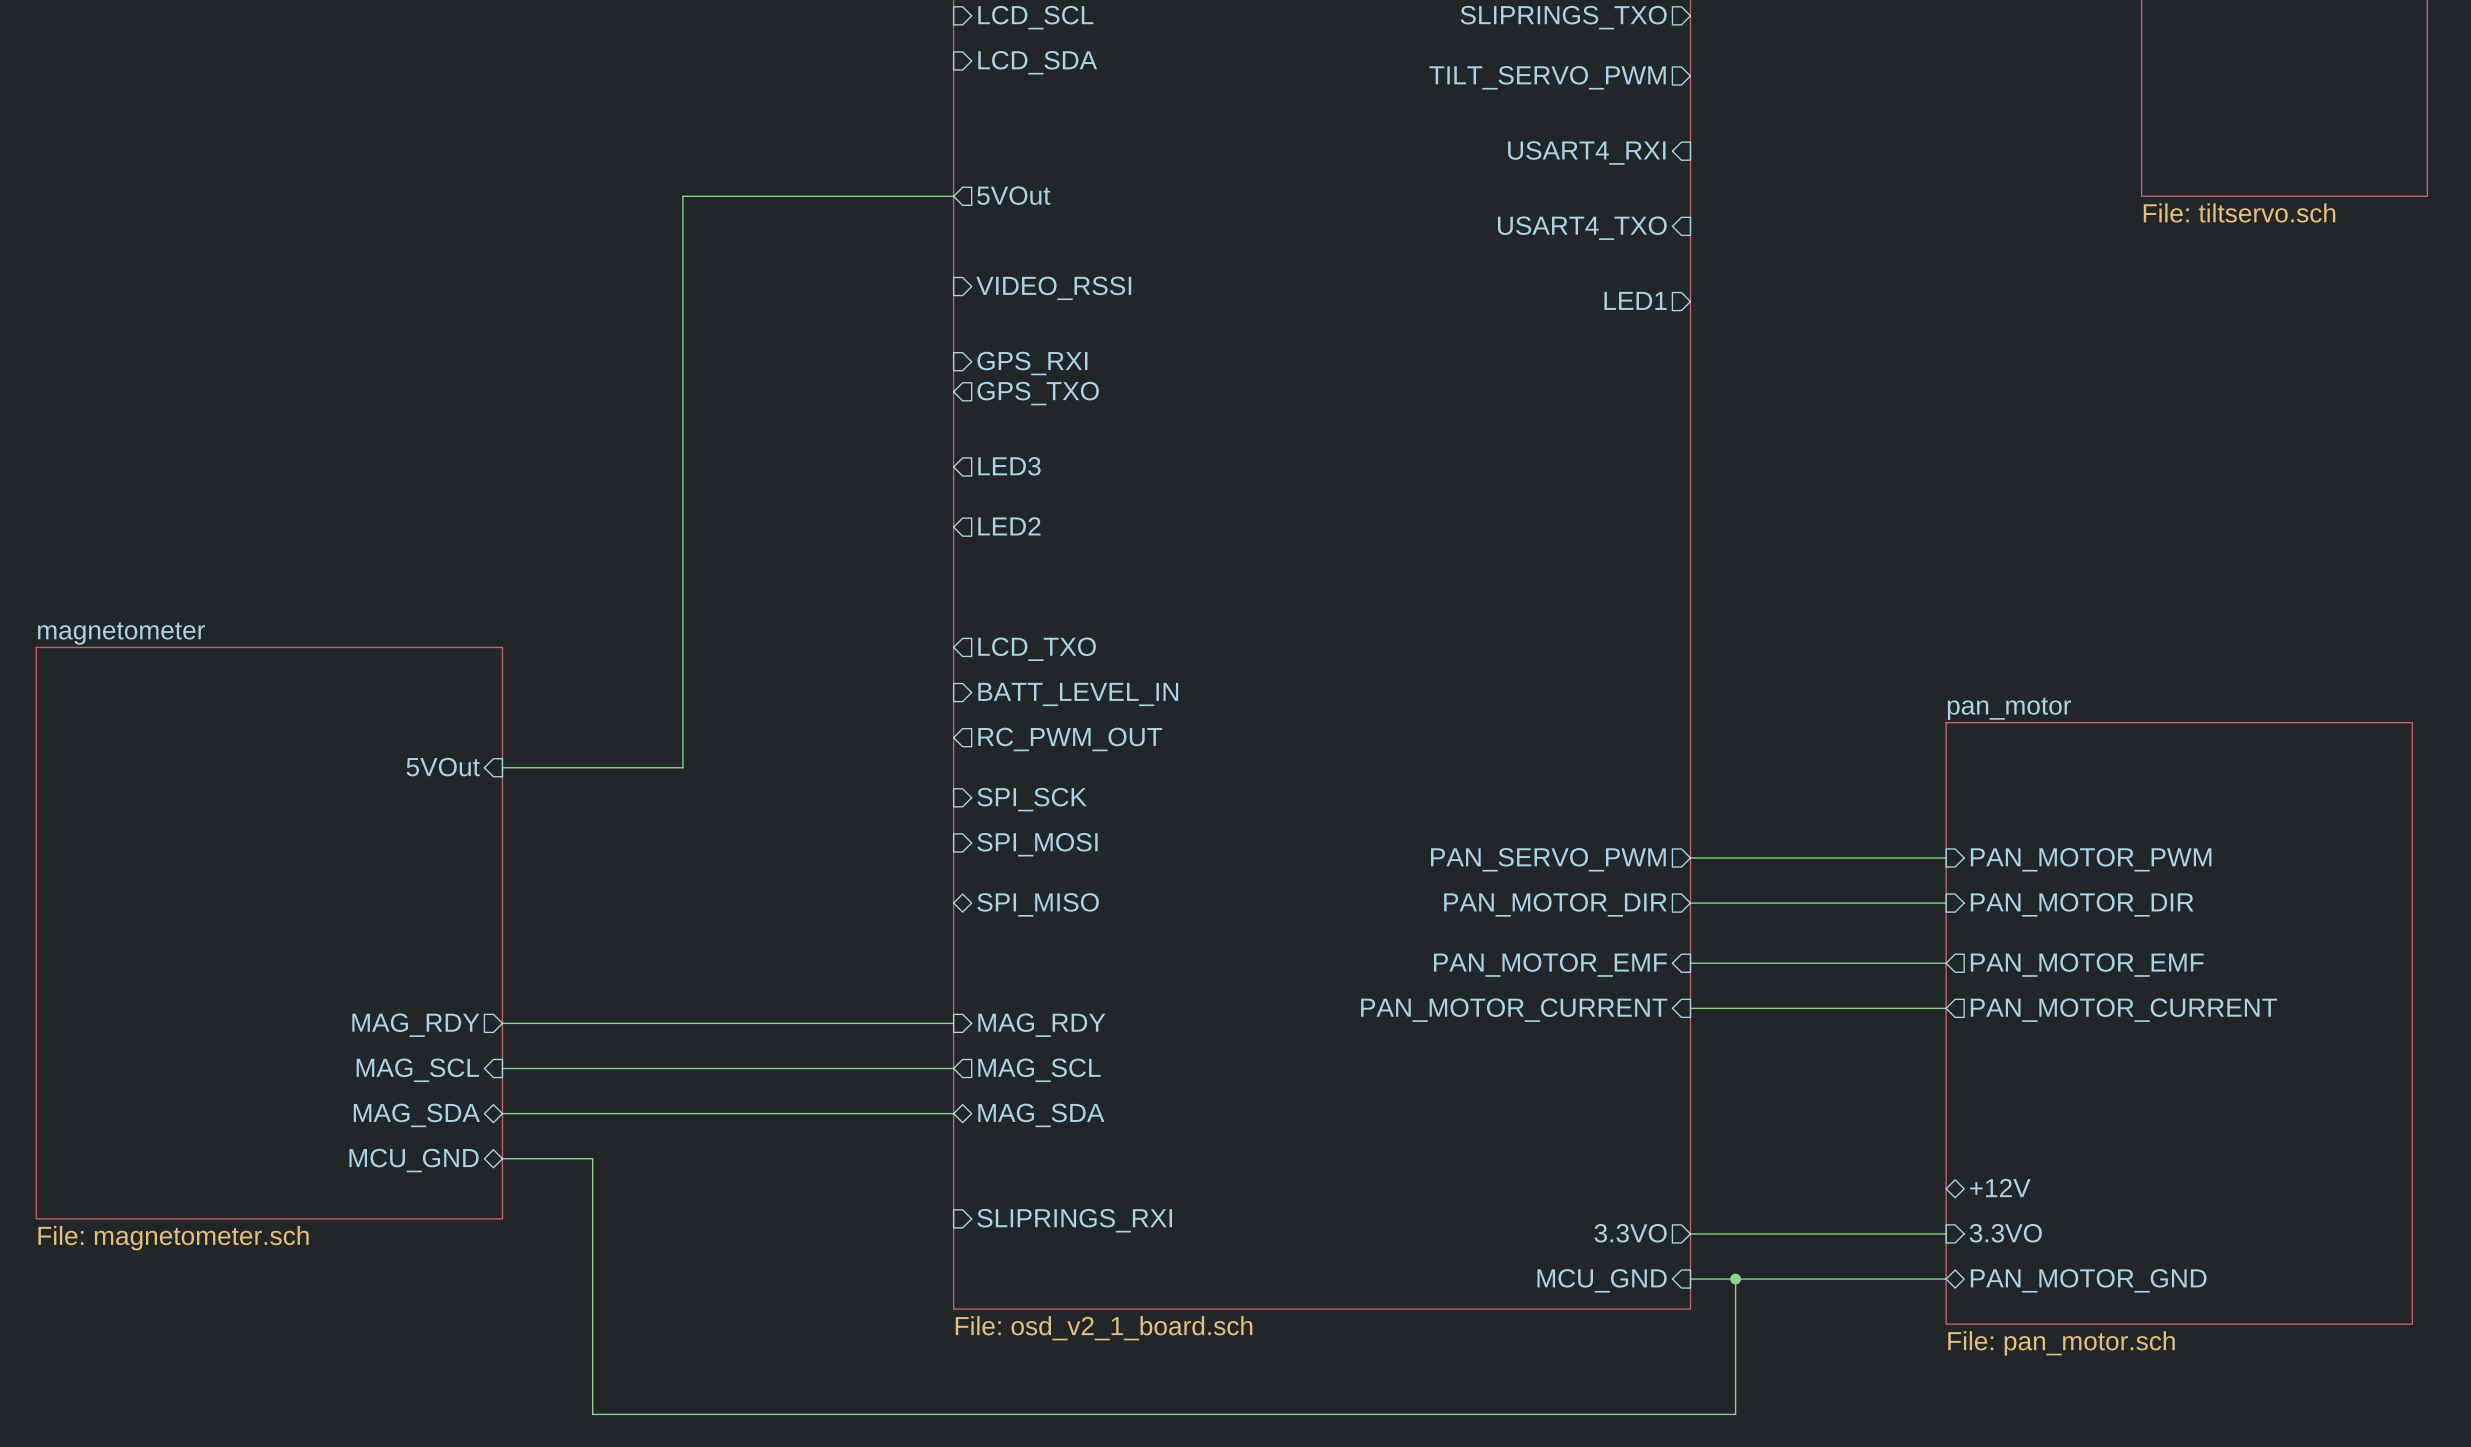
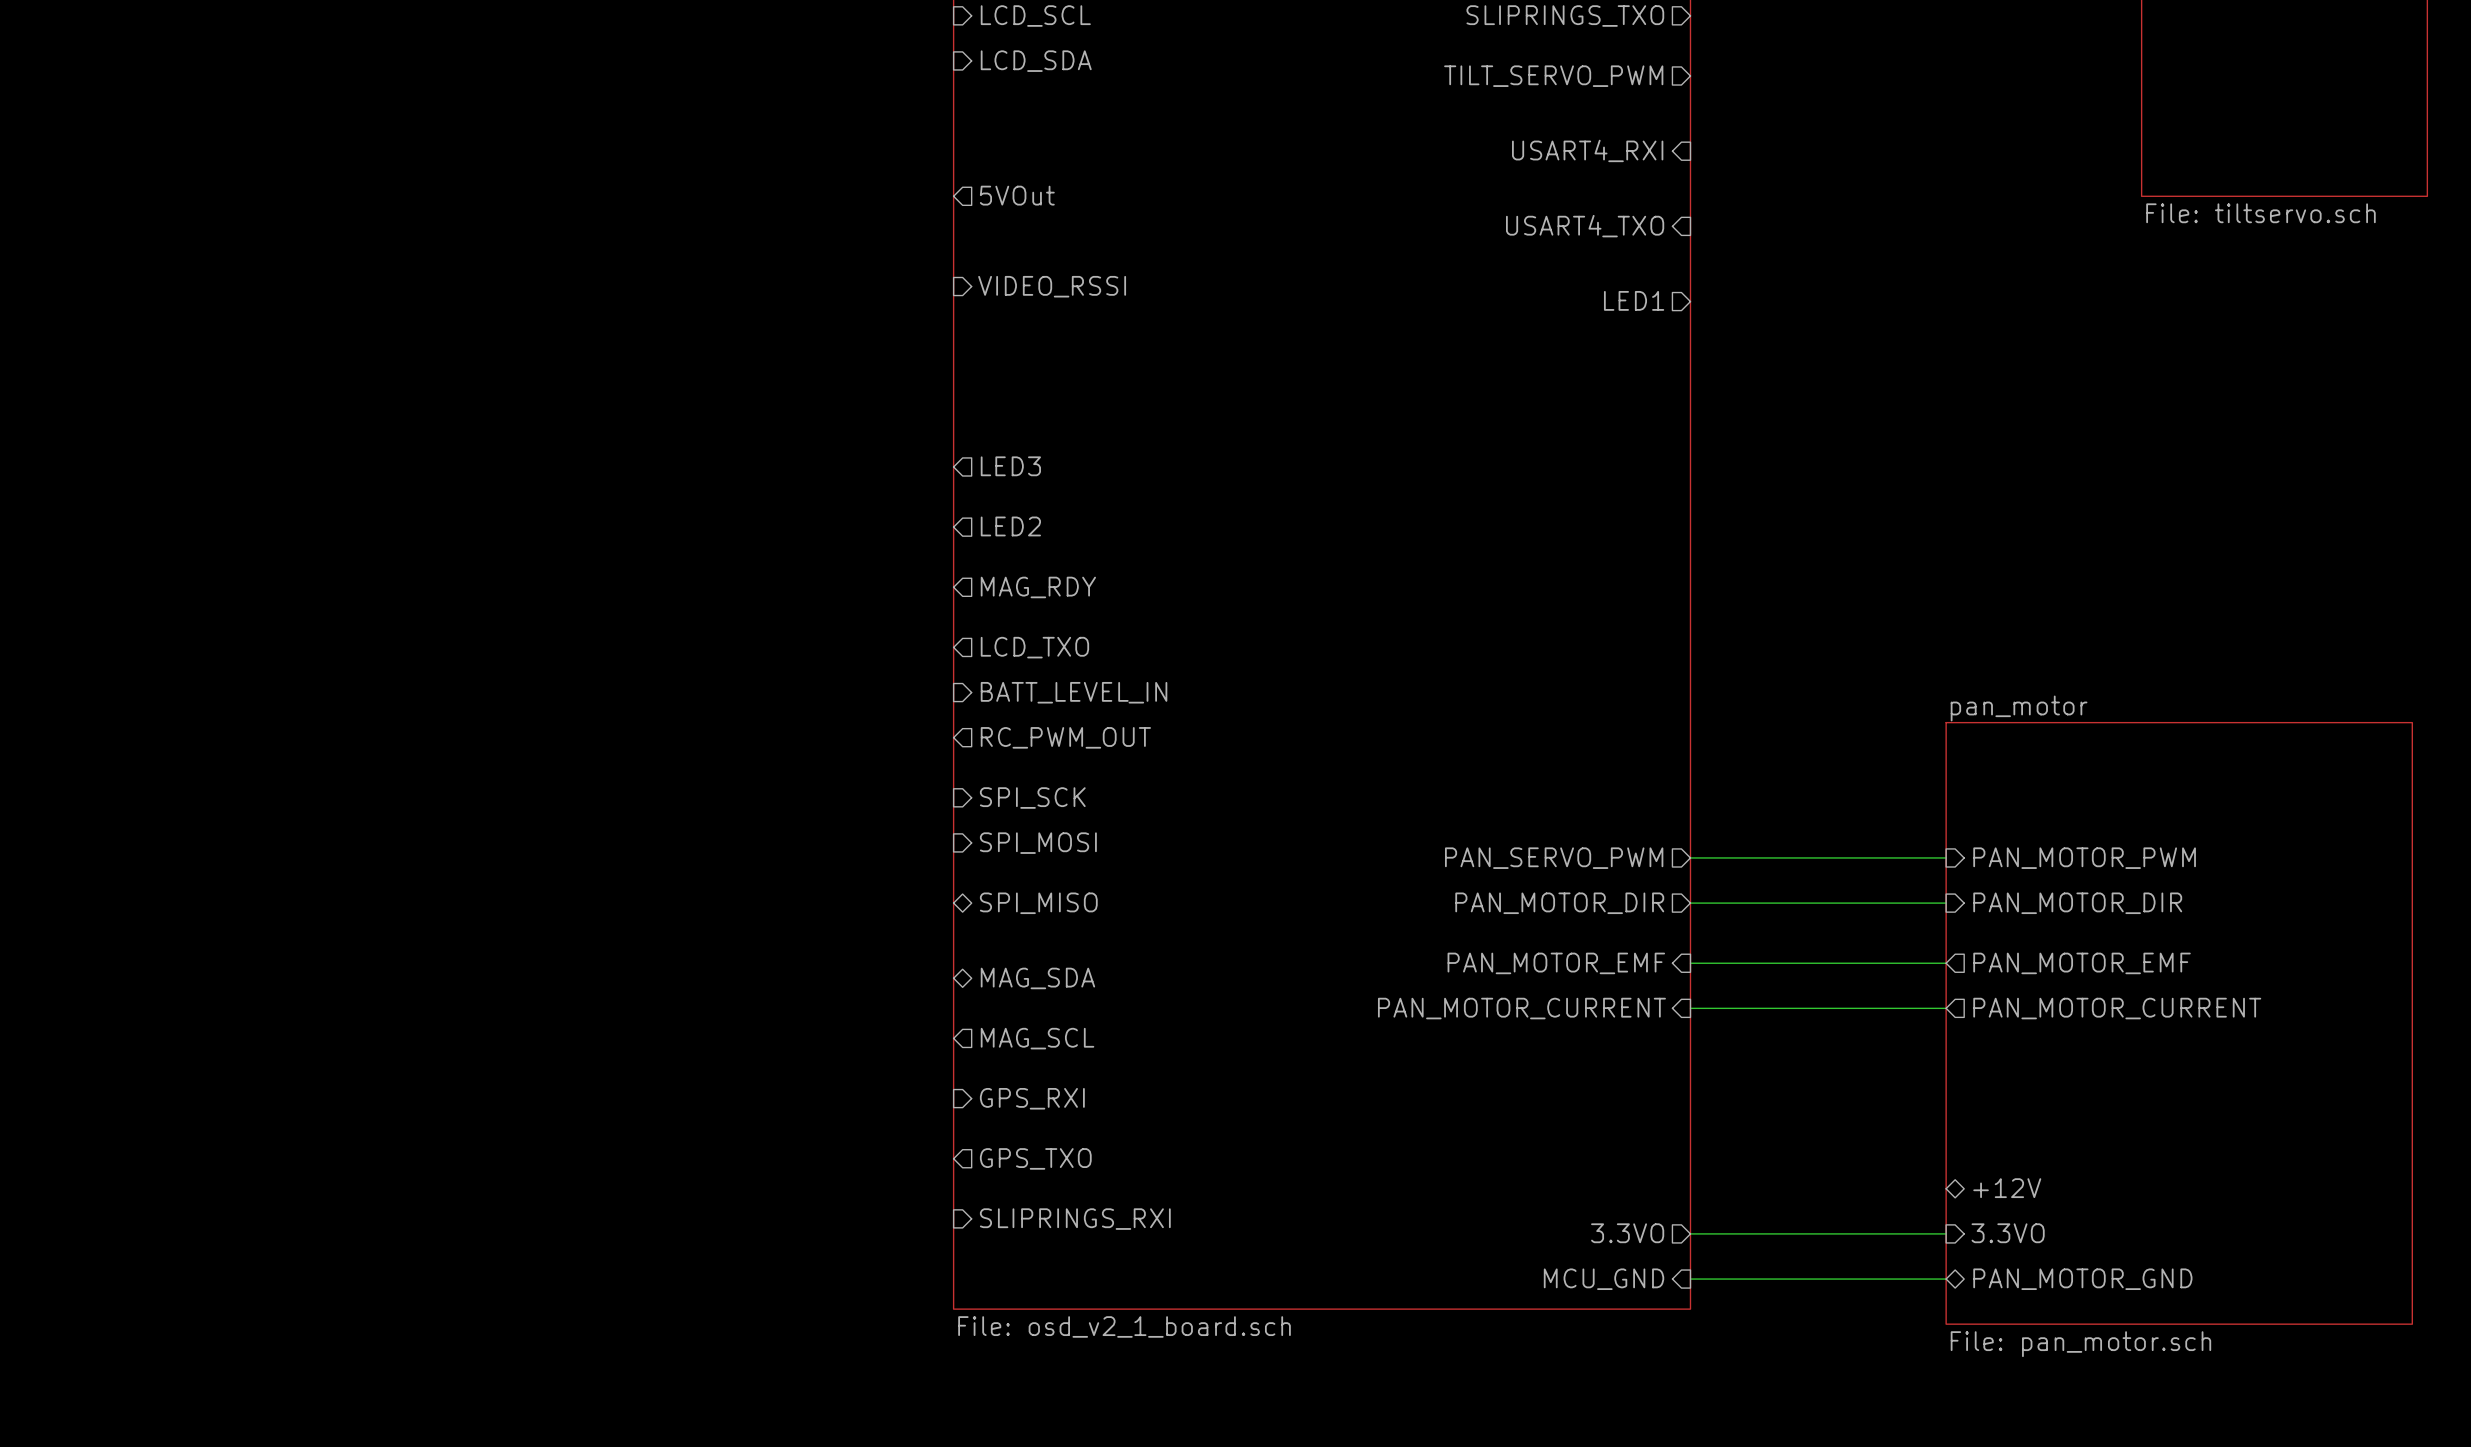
wire: (953, 196) (682, 196) (682, 767) (502, 767) -> none
sheet pin: GPS_RXI (1032, 363) -> none
sheet pin: GPS_TXO (1038, 393) -> none
sheet pin: none -> MAG_RDY (1038, 587)
sheet pin: 5VOut (443, 767) -> none
sheet magnetometer: File: magnetometer.sch (269, 933) -> none
wire: (502, 1023) (953, 1023) -> none
sheet pin: MAG_RDY (415, 1025) -> none
sheet pin: MAG_RDY (1041, 1025) -> none
wire: (502, 1068) (953, 1068) -> none
sheet pin: MAG_SCL (417, 1070) -> none
sheet pin position: MAG_SCL (1039, 1070) -> MAG_SCL (1037, 1038)
sheet pin: none -> GPS_RXI (1032, 1098)
wire: (502, 1113) (953, 1113) -> none
sheet pin: MAG_SDA (416, 1115) -> none
sheet pin position: MAG_SDA (1041, 1115) -> MAG_SDA (1037, 978)
wire: (502, 1158) (592, 1158) (592, 1414) (1735, 1414) (1735, 1279) -> none
sheet pin: MCU_GND (414, 1160) -> none
sheet pin: none -> GPS_TXO (1035, 1158)
junction: (1735, 1279) -> none

